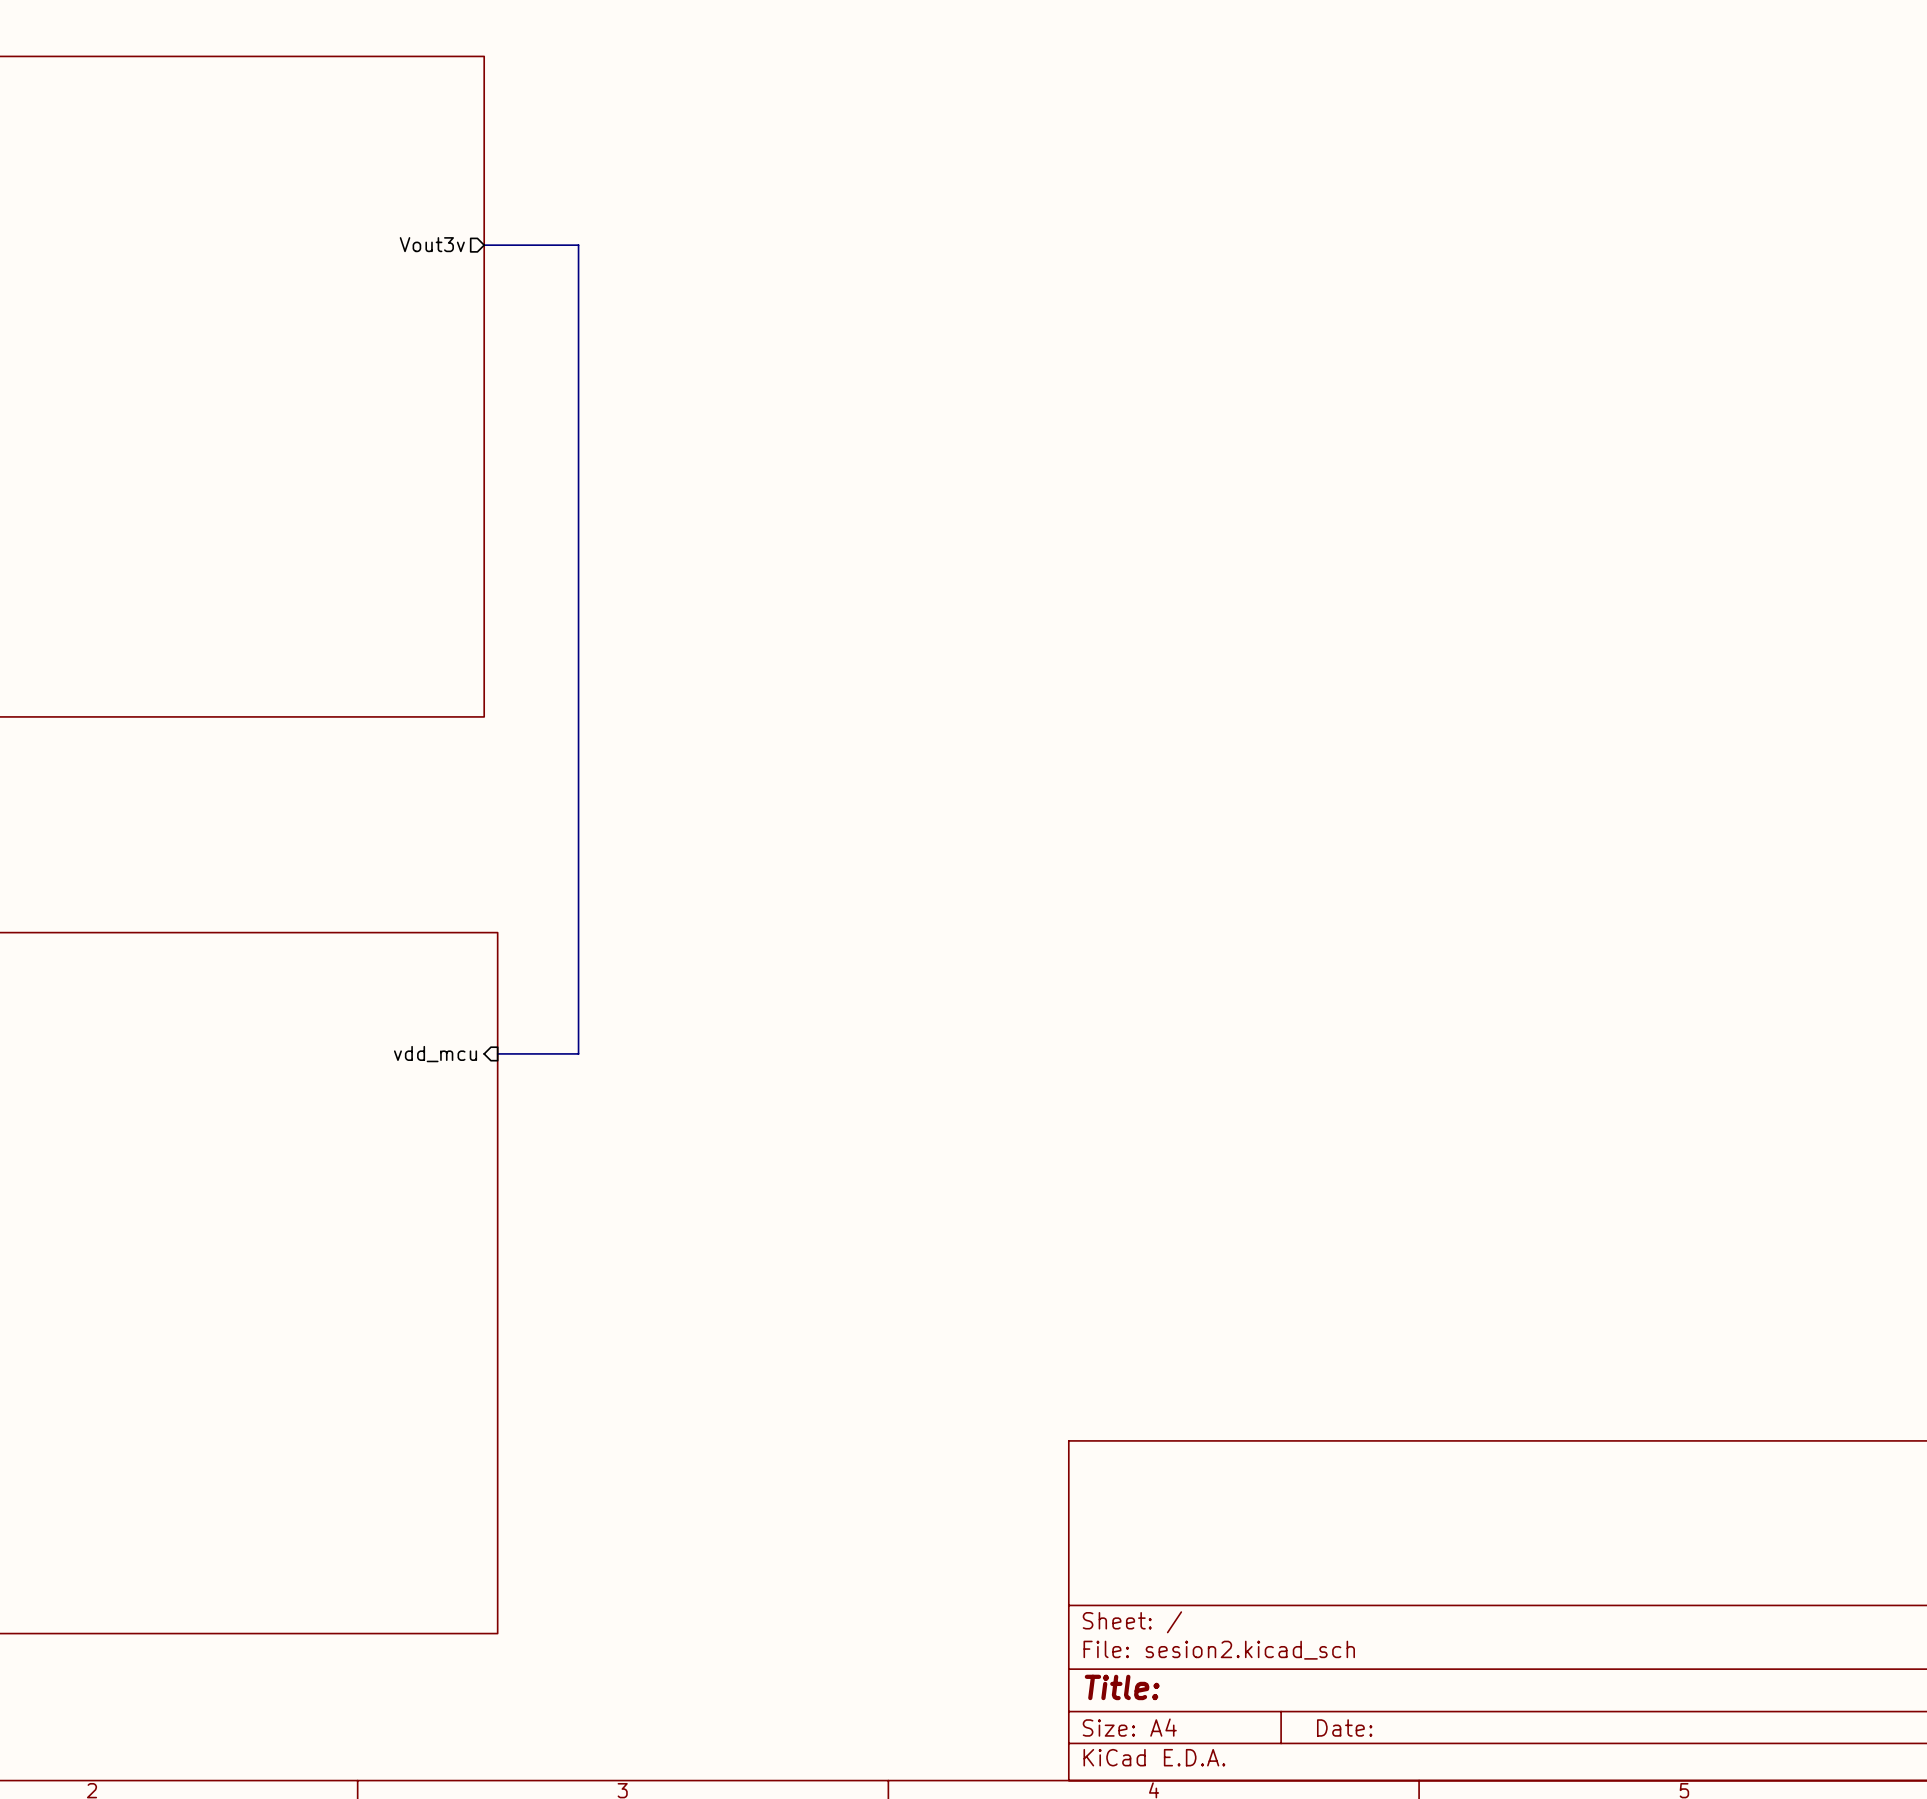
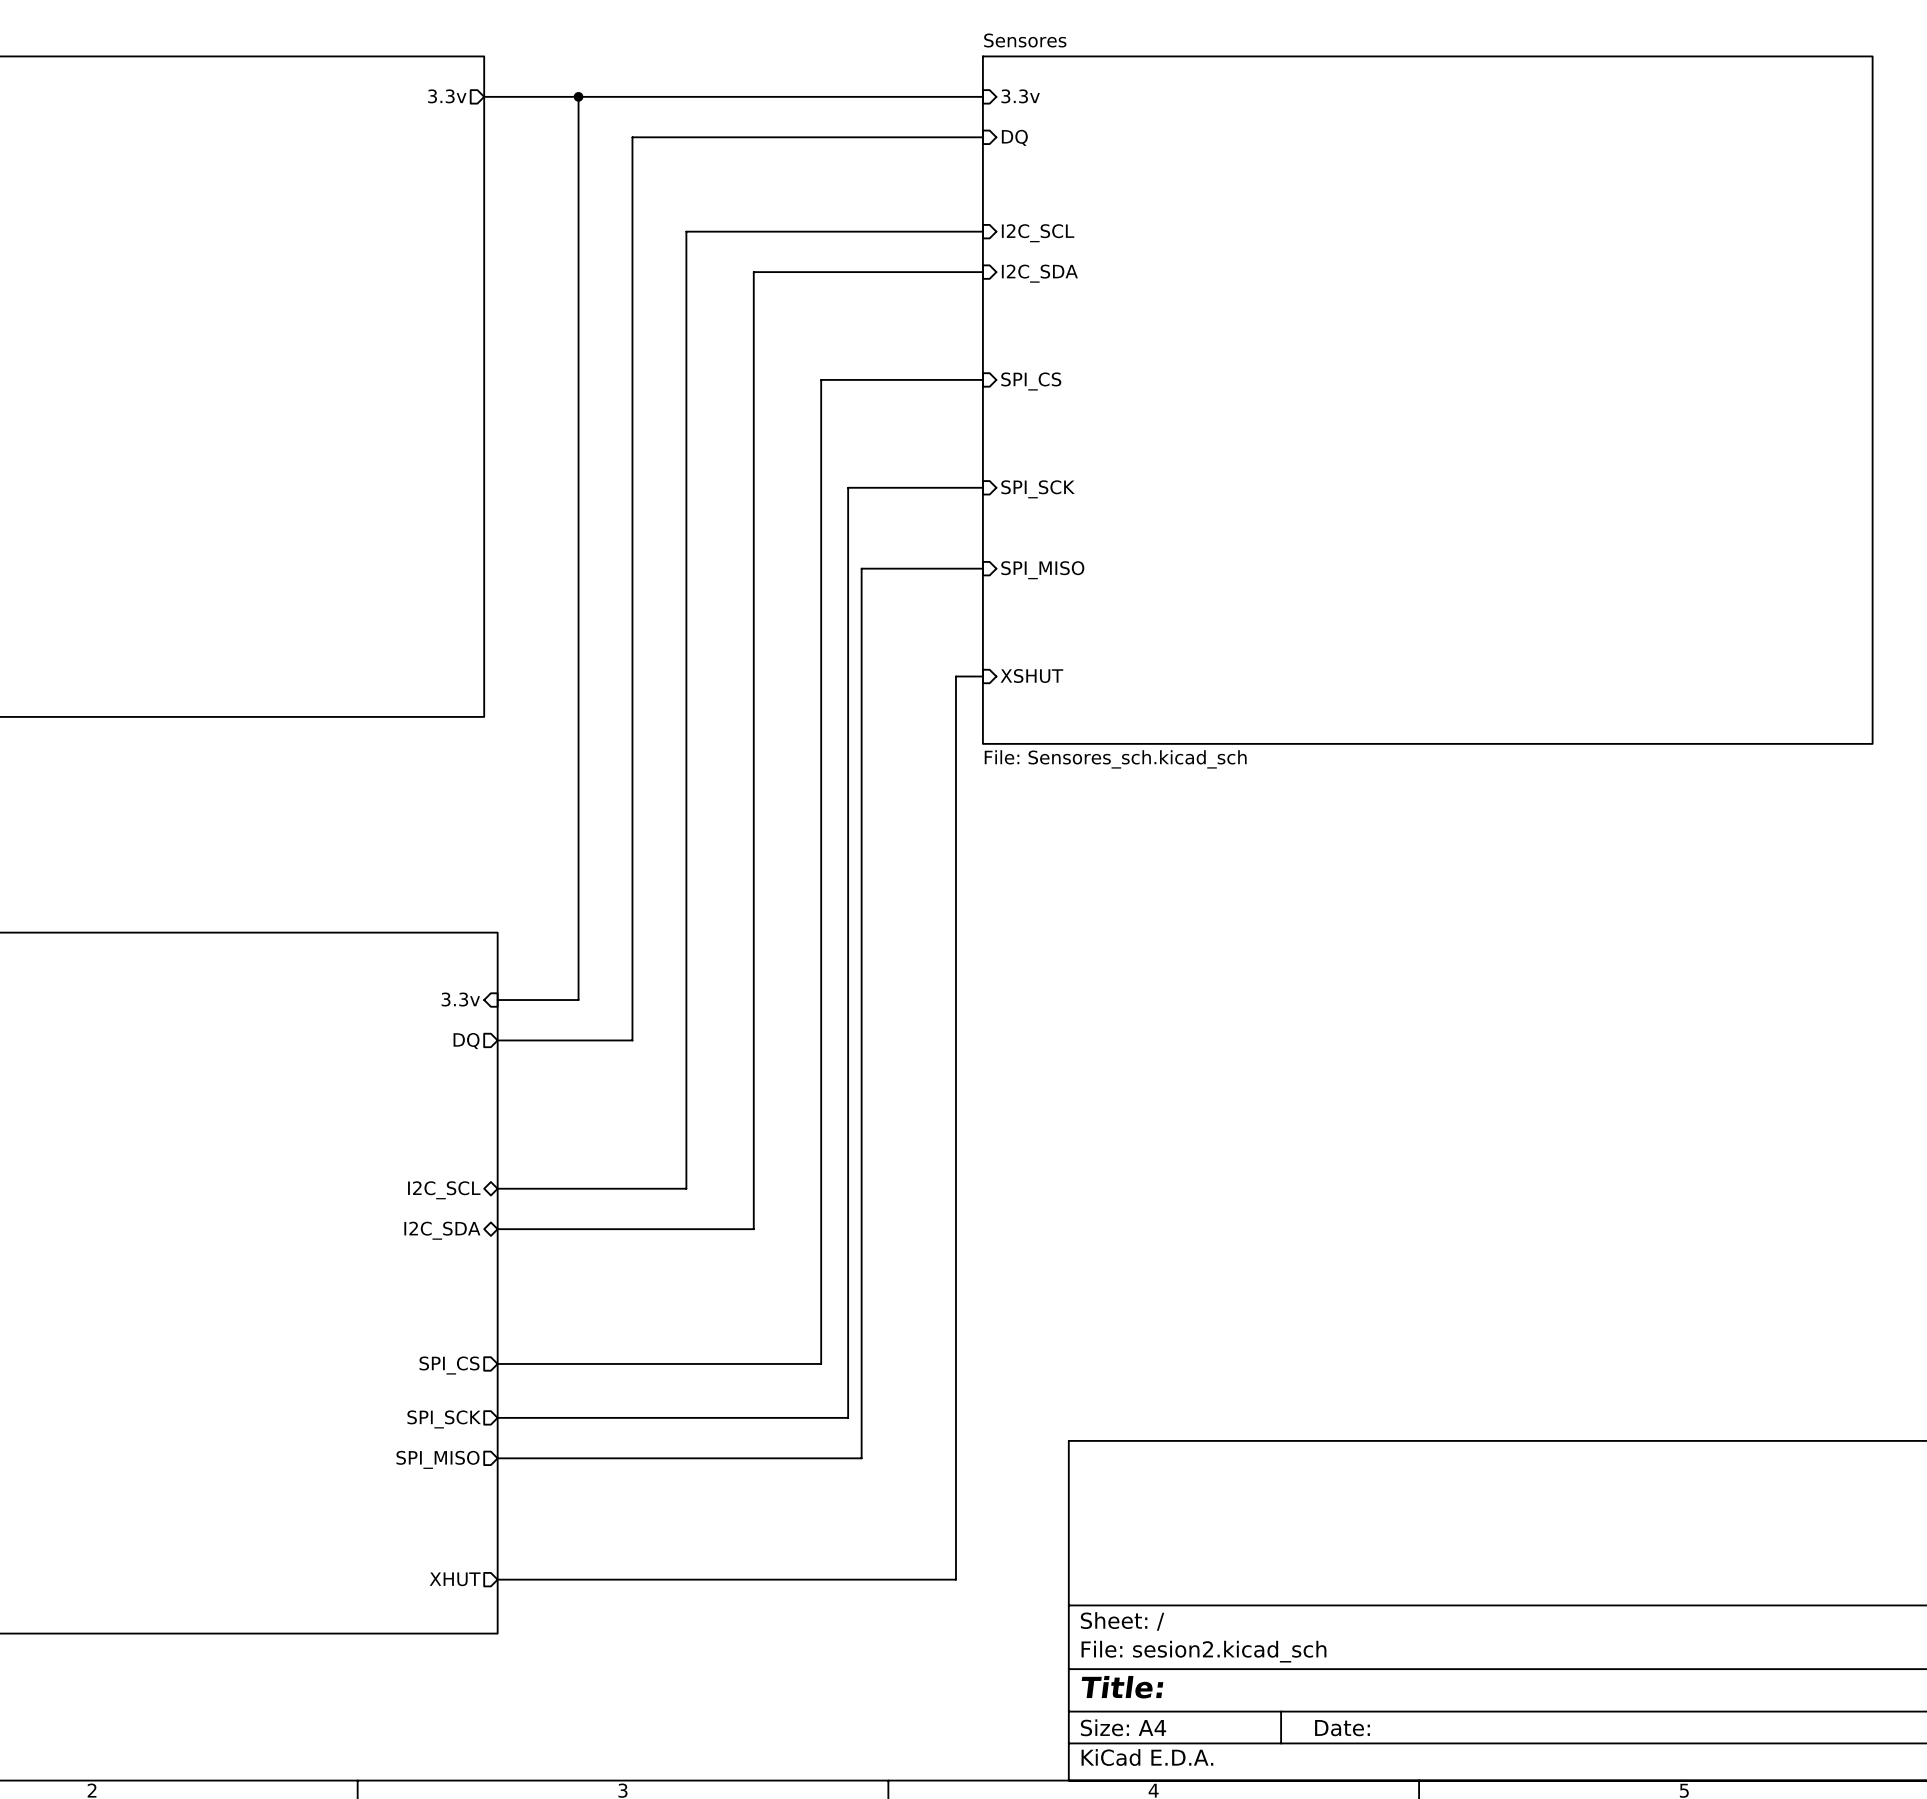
sheet pin: none -> 3.3v (447, 96)
wire: none -> (484, 96) (982, 96)
junction: none -> (578, 96)
sheet pin: none -> 3.3v (1020, 96)
wire: none -> (982, 137) (632, 137) (632, 1040) (497, 1040)
sheet pin: none -> DQ (1014, 137)
wire: none -> (982, 231) (686, 231) (686, 1188) (497, 1188)
sheet pin: none -> I2C_SCL (1038, 233)
sheet pin: Vout3v (432, 244) -> none
wire: (484, 245) (578, 245) -> (578, 96) (578, 245)
wire: none -> (982, 272) (753, 272) (753, 1229) (497, 1229)
sheet pin: none -> I2C_SDA (1039, 273)
wire: none -> (982, 379) (821, 379) (821, 1363) (497, 1363)
sheet pin: none -> SPI_CS (1031, 381)
sheet Sensores: none -> File: Sensores_sch.kicad_sch (1427, 400)
wire: none -> (982, 487) (848, 487) (848, 1417) (497, 1417)
sheet pin: none -> SPI_SCK (1038, 489)
wire: none -> (982, 568) (861, 568) (861, 1458) (497, 1458)
sheet pin: none -> SPI_MISO (1042, 570)
wire: none -> (982, 676) (955, 676) (955, 1579) (497, 1579)
sheet pin: none -> XSHUT (1031, 676)
sheet pin: none -> 3.3v (460, 999)
wire: (578, 1000) (578, 1053) (497, 1053) -> (578, 1000) (497, 1000)
sheet pin: none -> DQ (466, 1041)
sheet pin: vdd_mcu (435, 1054) -> none
sheet pin: none -> I2C_SCL (444, 1190)
sheet pin: none -> I2C_SDA (442, 1230)
sheet pin: none -> SPI_CS (449, 1365)
sheet pin: none -> SPI_SCK (444, 1419)
sheet pin: none -> SPI_MISO (438, 1459)
sheet pin: none -> XHUT (455, 1579)

